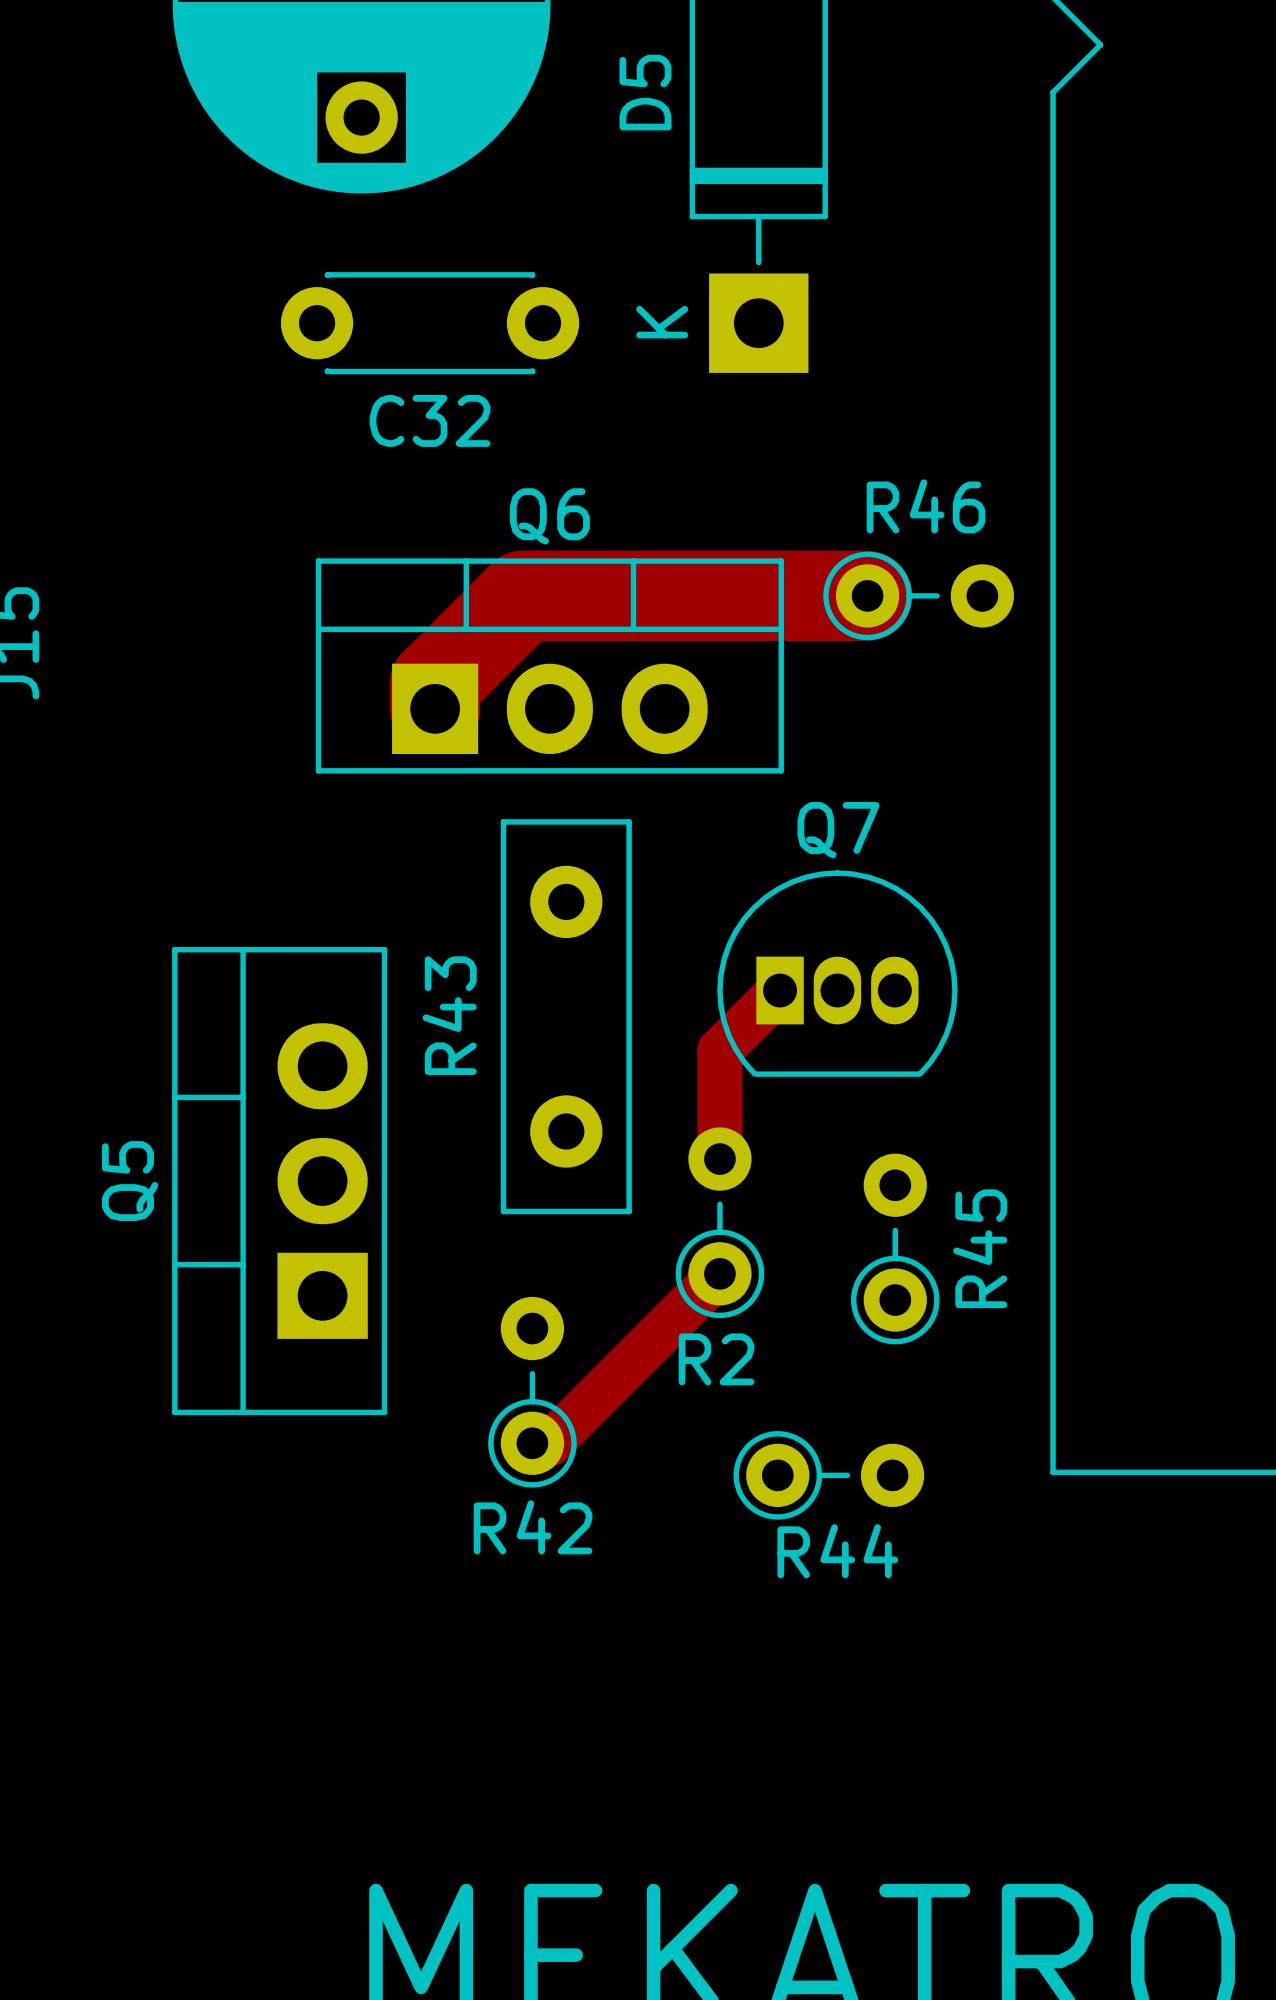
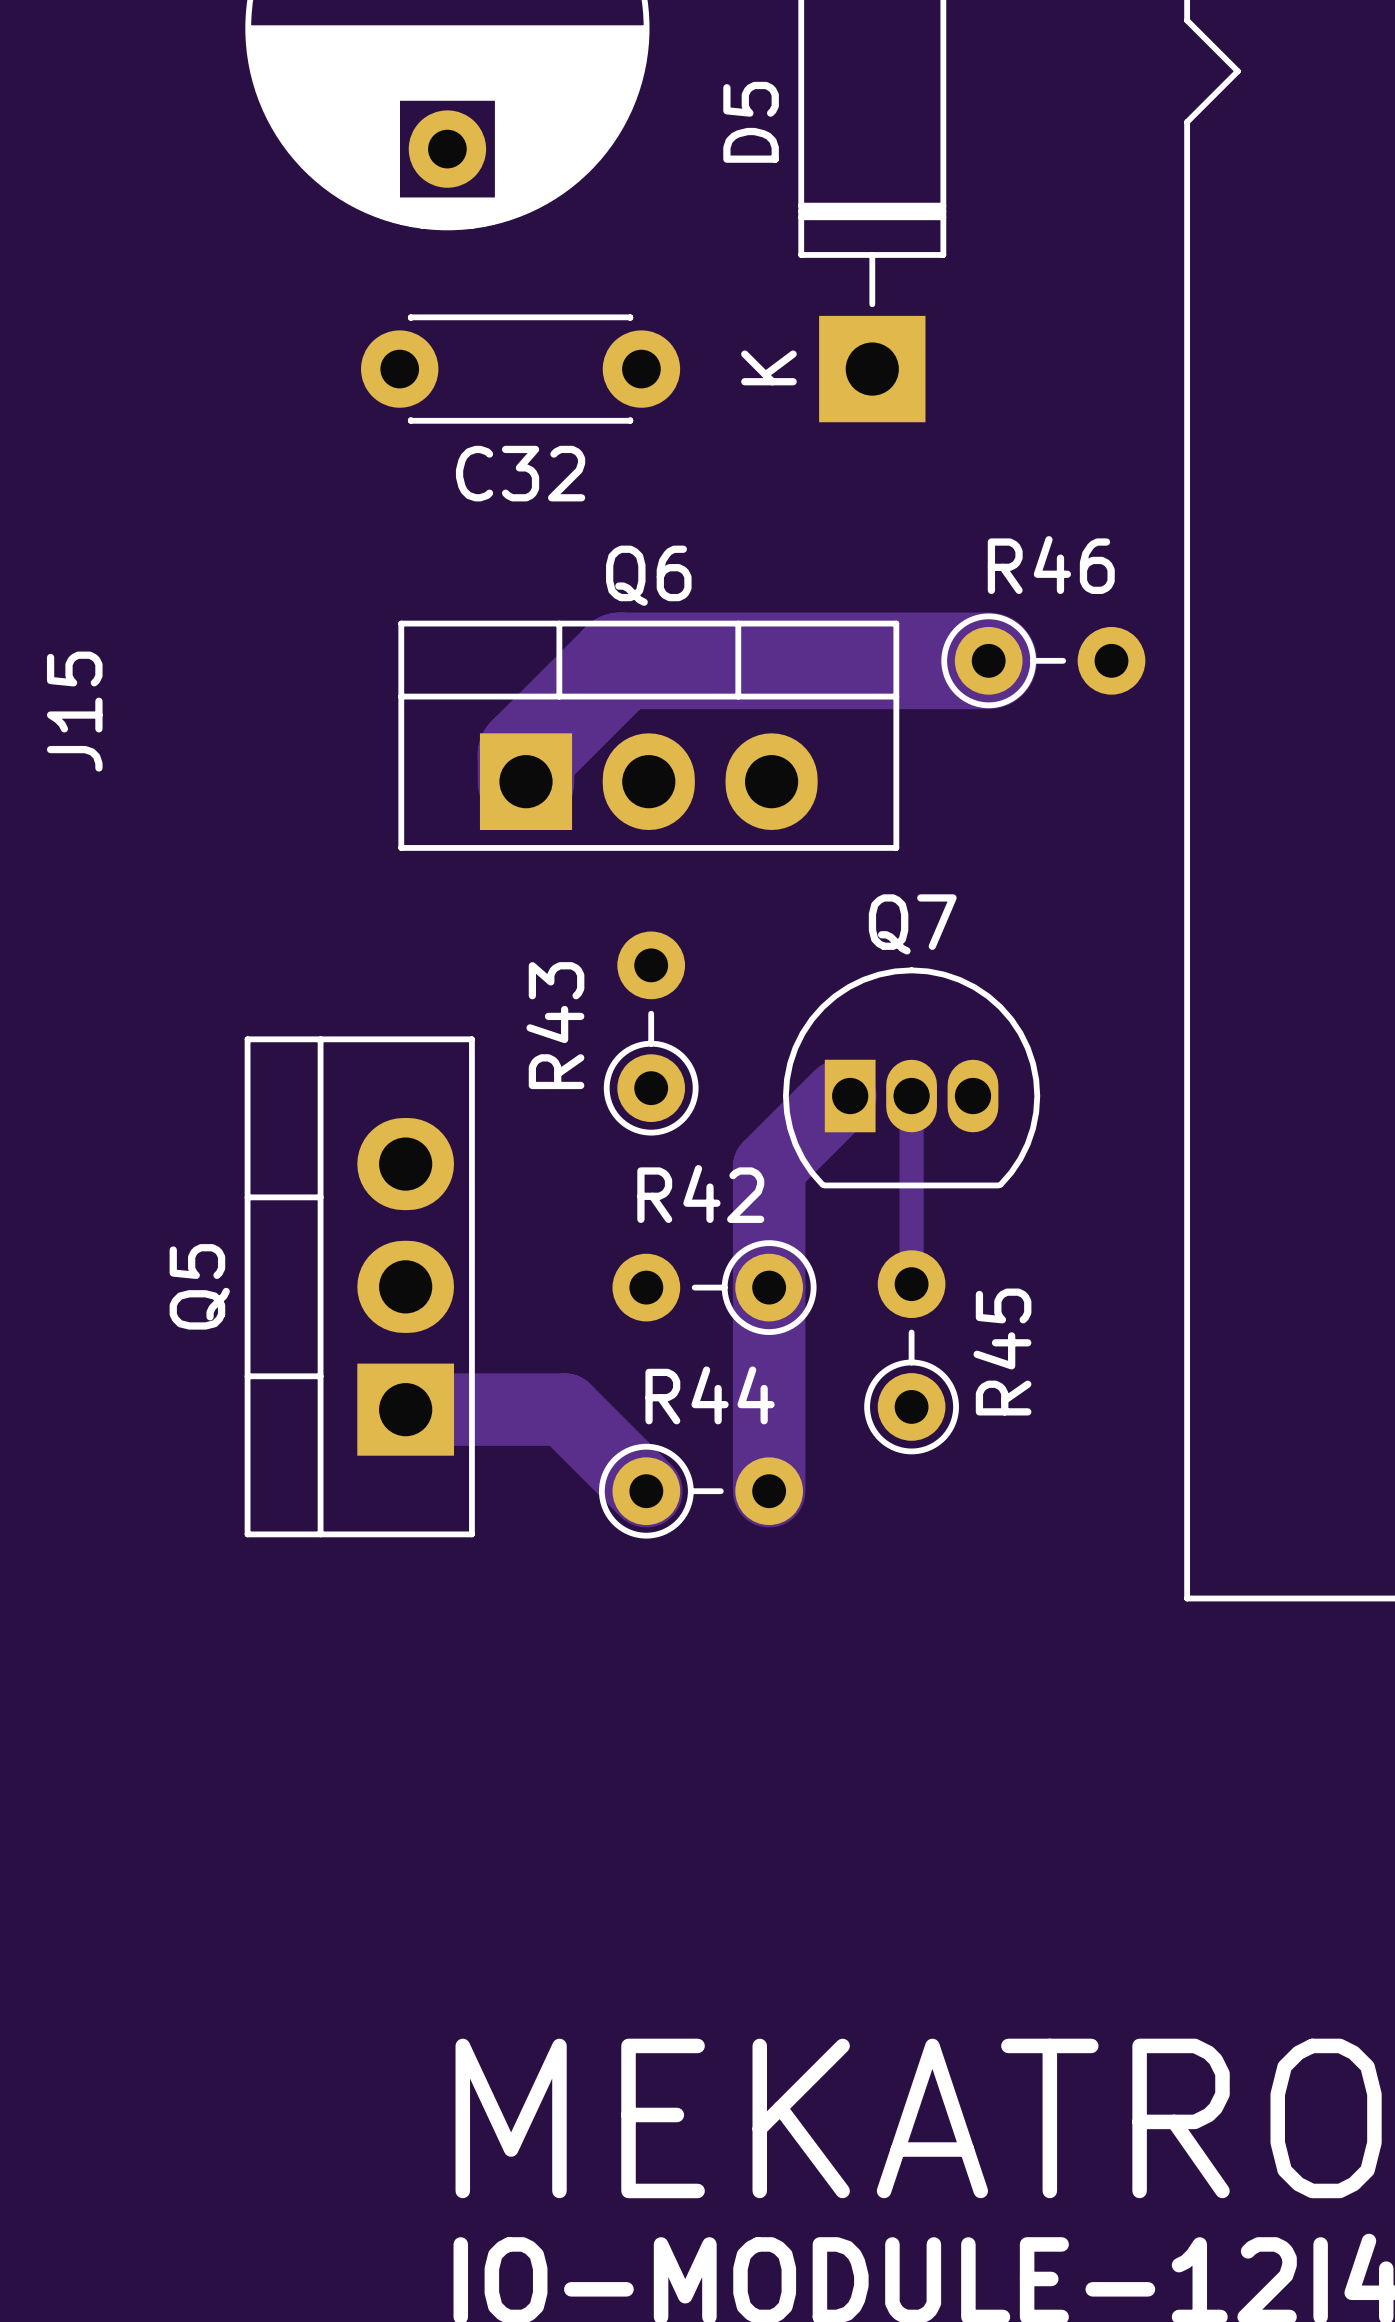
R43 footprint: [500, 819, 632, 1215] -> [603, 931, 699, 1136]
Q7 position: (837, 973) -> (911, 1077)
track: (780, 990) (719, 1050) (719, 1159) -> none
track: none -> (840, 1096) (769, 1167) (769, 1491)
track: none -> (911, 1096) (911, 1284)
R2: (719, 1222) -> none
R45 position: (895, 1248) -> (911, 1352)
track: (719, 1273) (550, 1443) (532, 1443) -> none
track: none -> (405, 1409) (564, 1409) (646, 1491)
R42 rotation: 0° (532, 1392) -> 90° counterclockwise (714, 1287)
R42 position: (532, 1392) -> (714, 1287)
R44 position: (828, 1475) -> (700, 1491)
R42 name position: R42 (533, 1527) -> R42 (700, 1194)
R44 name position: R44 (837, 1551) -> R44 (710, 1395)

